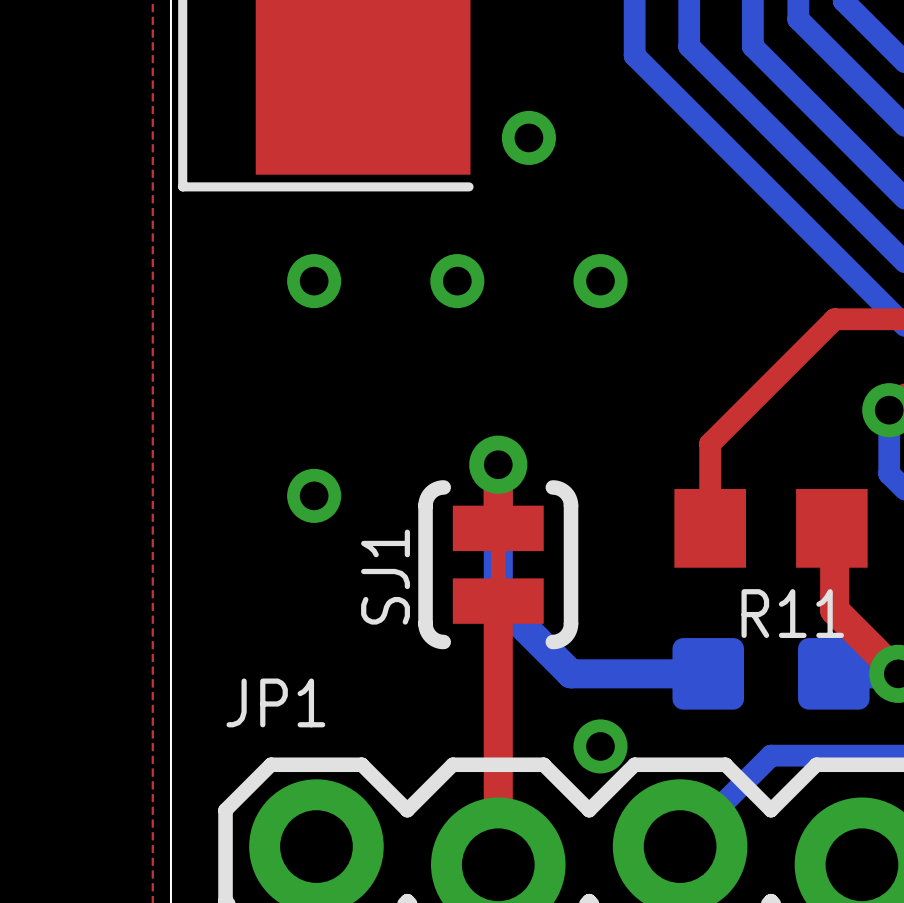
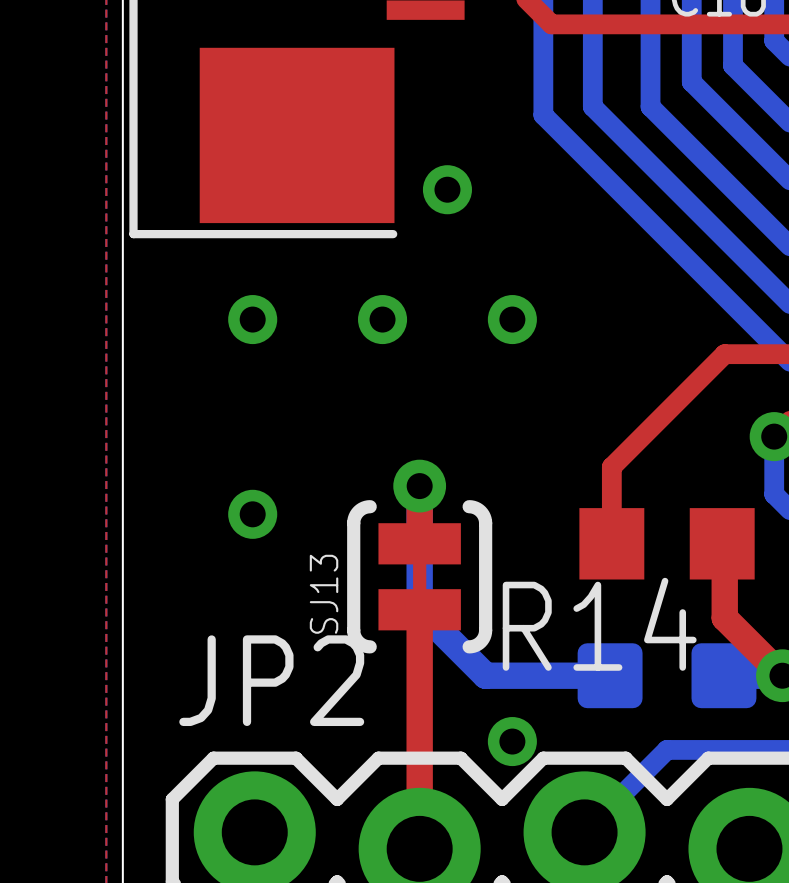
SJ1 name: SJ1 (385, 577) -> SJ13 (324, 594)
R11 name: R11 (792, 613) -> R14 (599, 624)
JP1 name: JP1 (275, 702) -> JP2 (271, 680)

